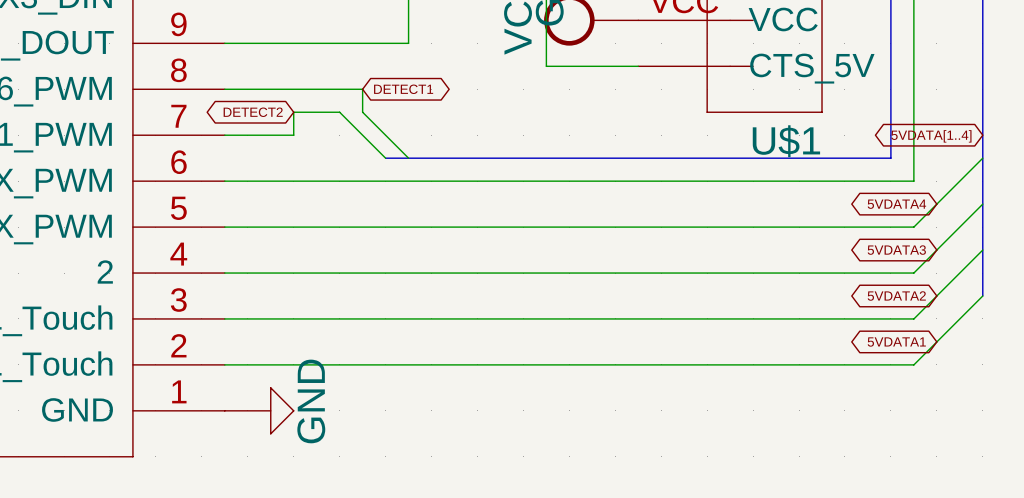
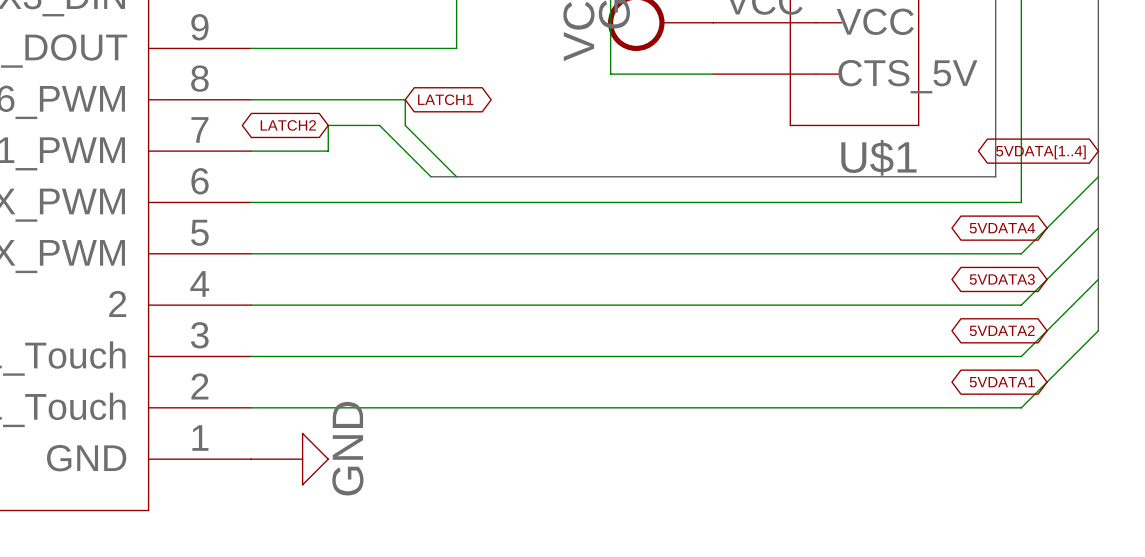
global label: DETECT1 (403, 89) -> LATCH1 (445, 99)
global label: DETECT2 (253, 112) -> LATCH2 (288, 125)

